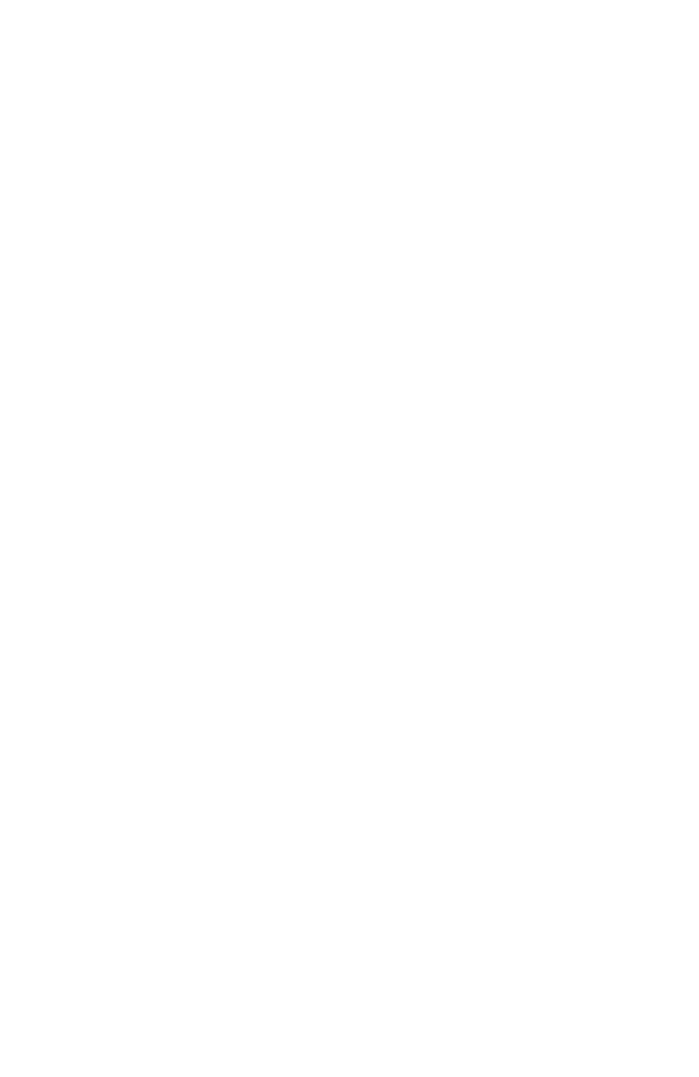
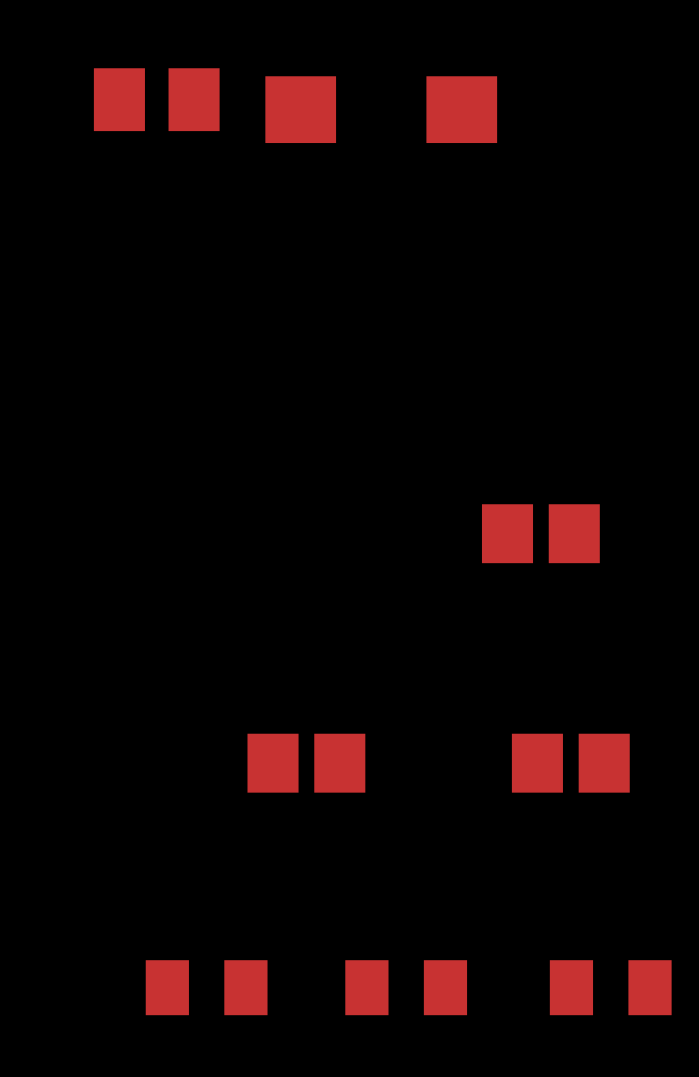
part: none -> (156, 99)
part: none -> (381, 109)
part: none -> (540, 533)
part: none -> (306, 763)
part: none -> (570, 763)
part: none -> (206, 987)
part: none -> (406, 987)
part: none -> (610, 987)

